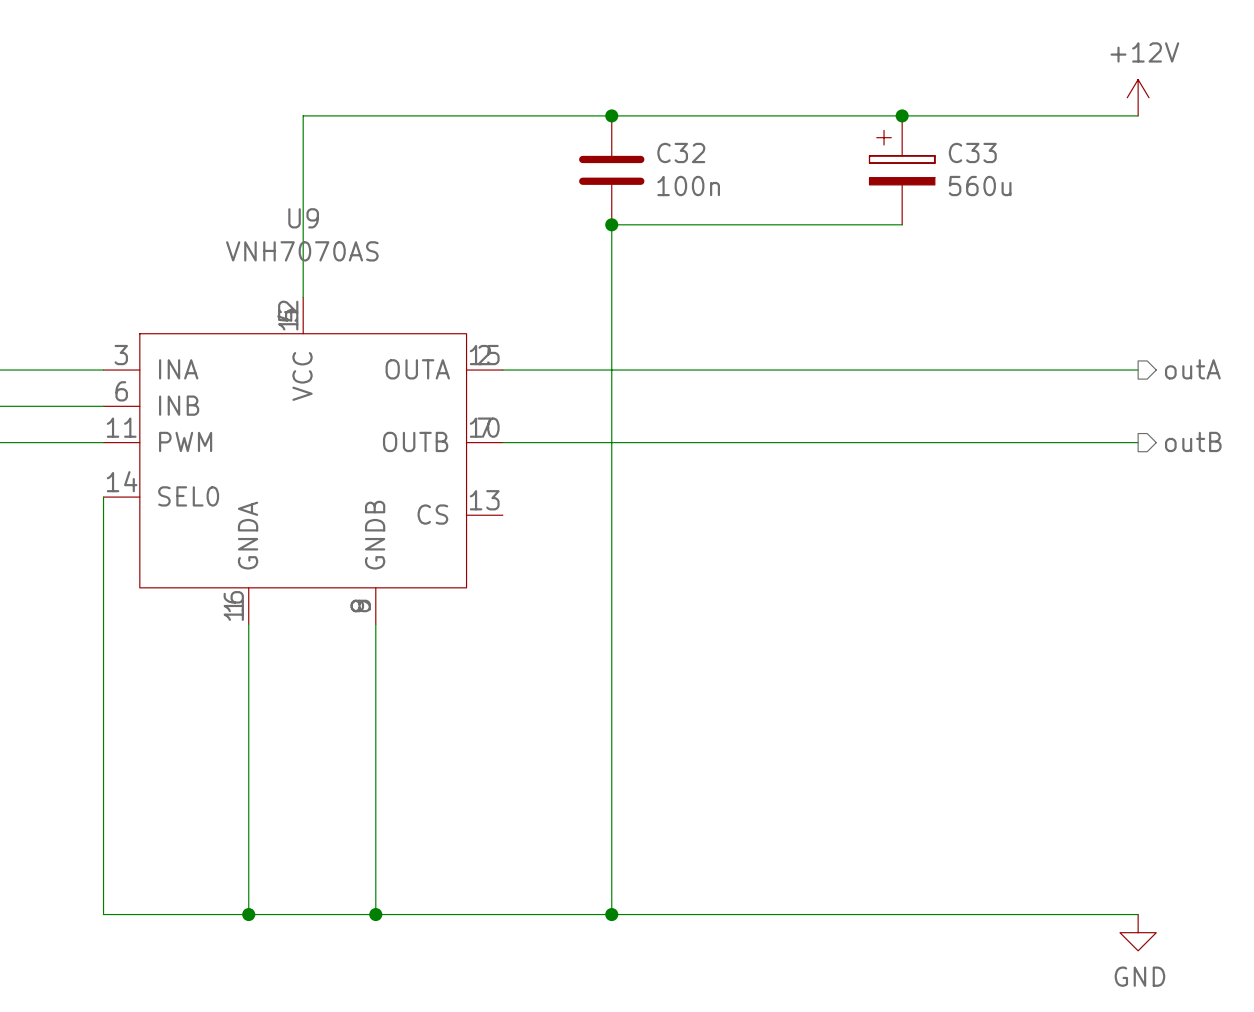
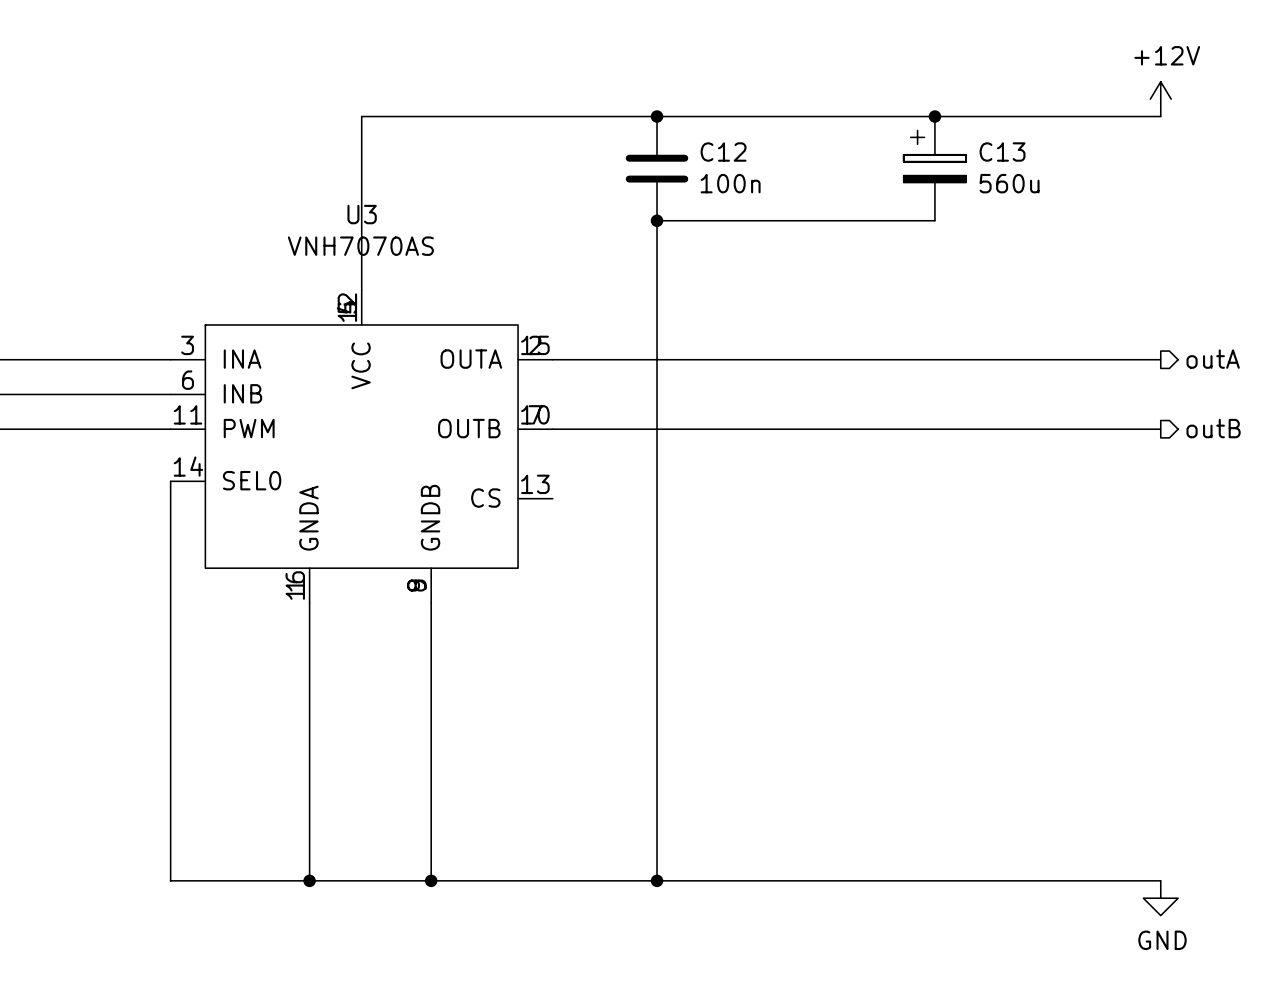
C32 name: C32 (681, 152) -> C12 (723, 152)
C33 name: C33 (972, 152) -> C13 (1002, 152)
U9 name: U9 (303, 218) -> U3 (362, 214)

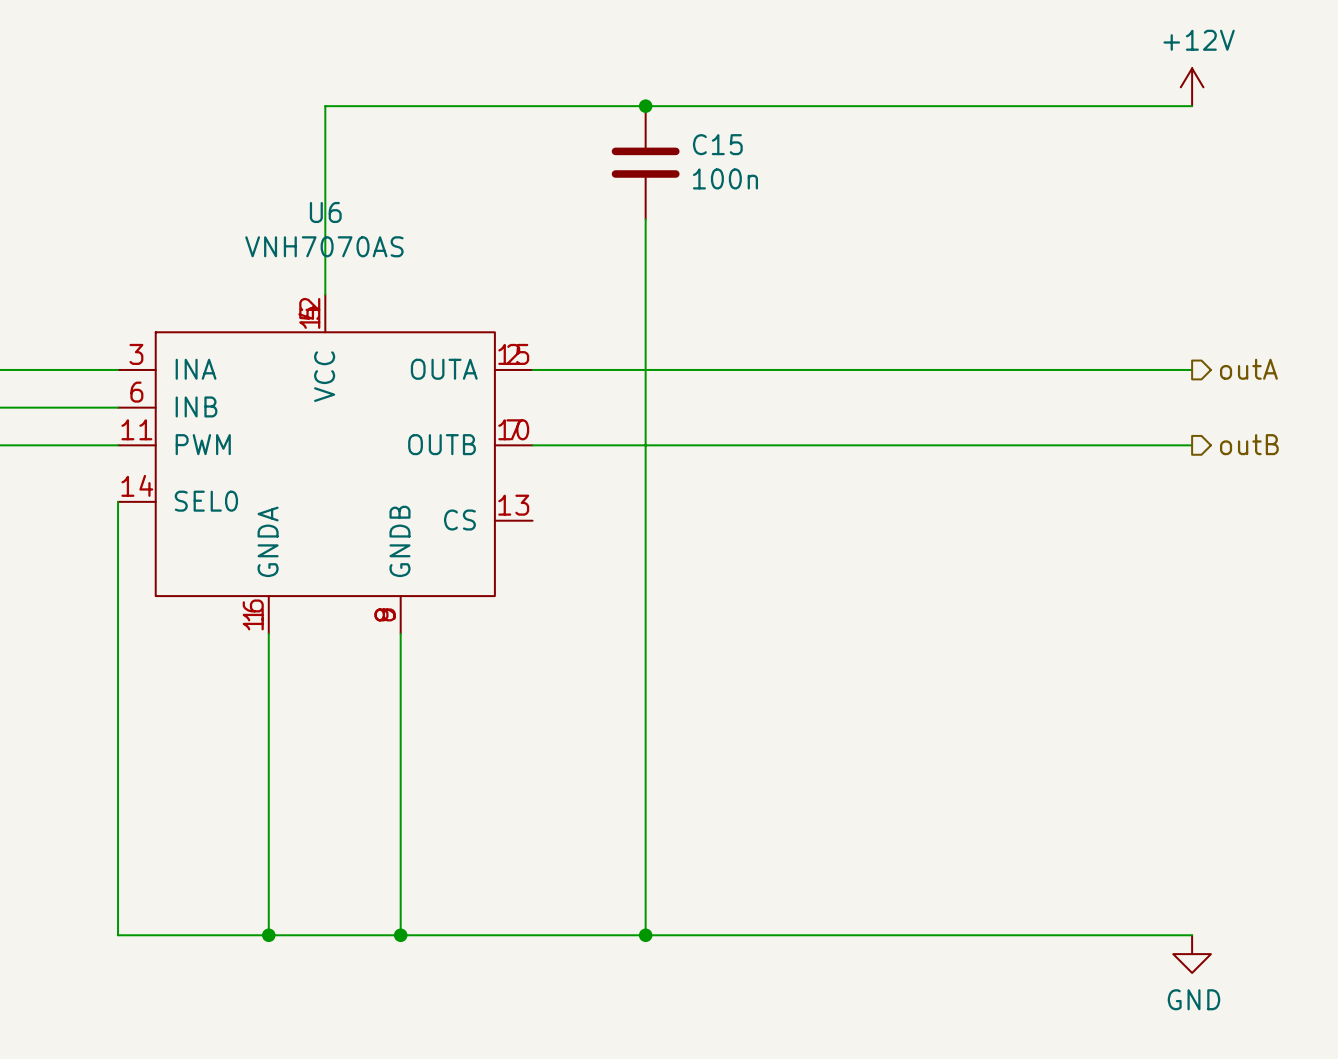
junction: (934, 116) -> none
C12 name: C12 (723, 152) -> C15 (717, 144)
C13: 560u (934, 168) -> none
U3 name: U3 (362, 214) -> U6 (325, 212)
wire: (657, 220) (934, 220) -> none
junction: (657, 220) -> none

